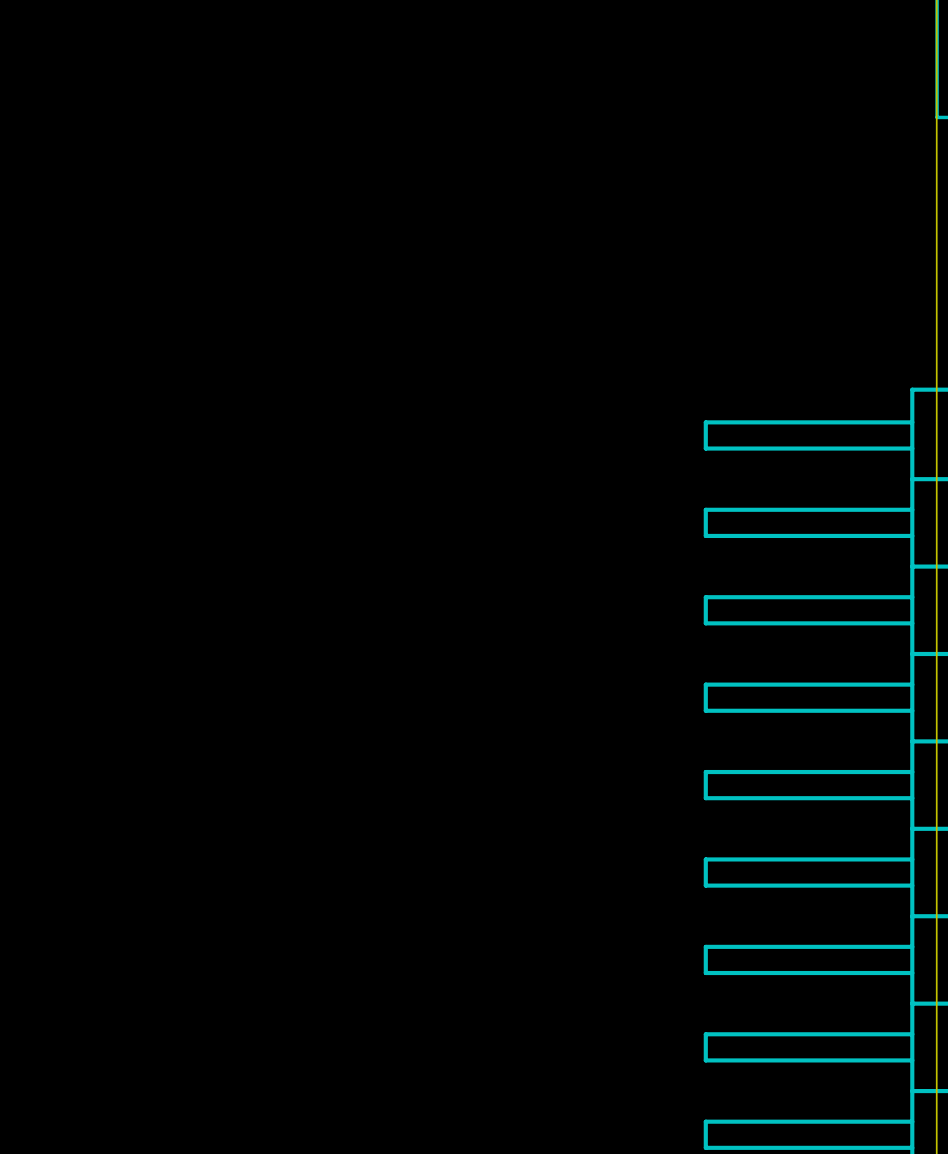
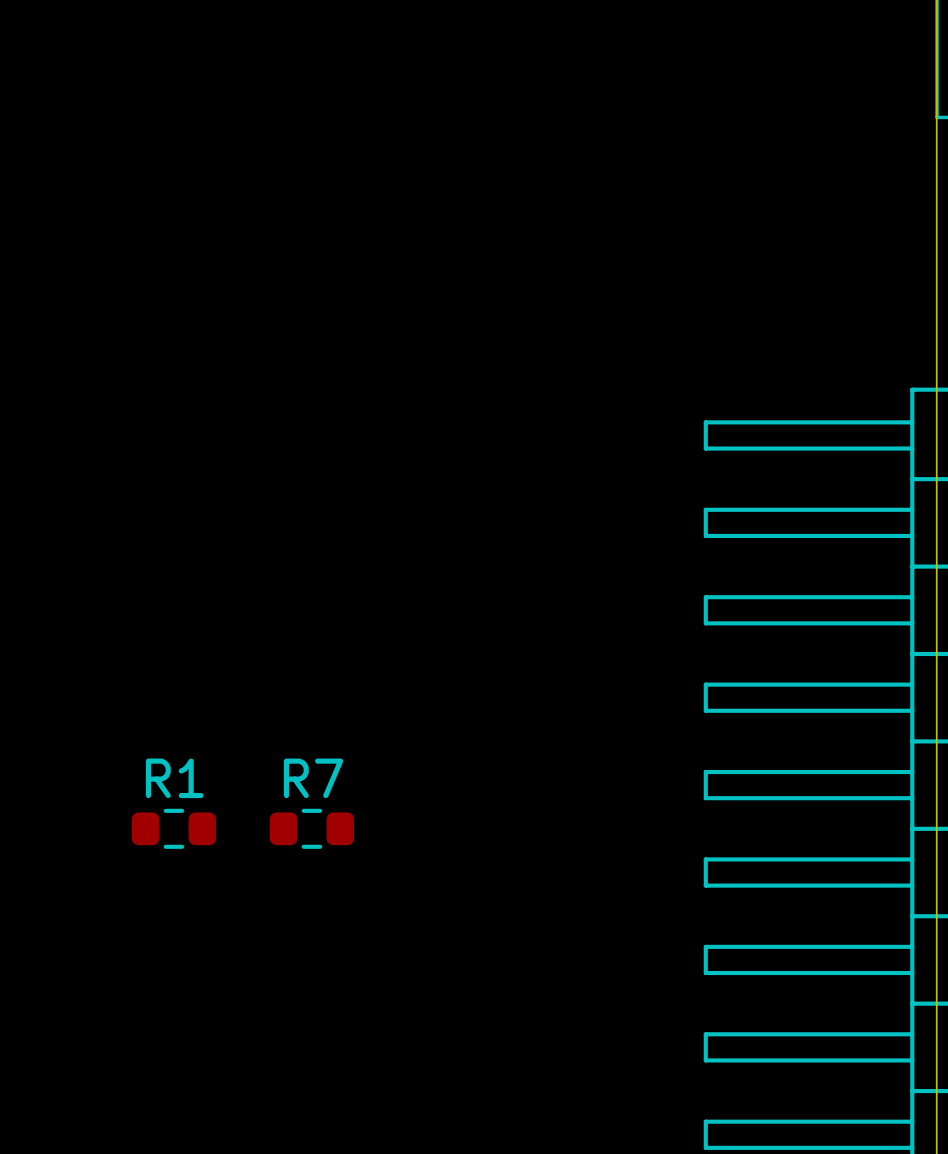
R1: none -> (173, 828)
R7: none -> (311, 828)

